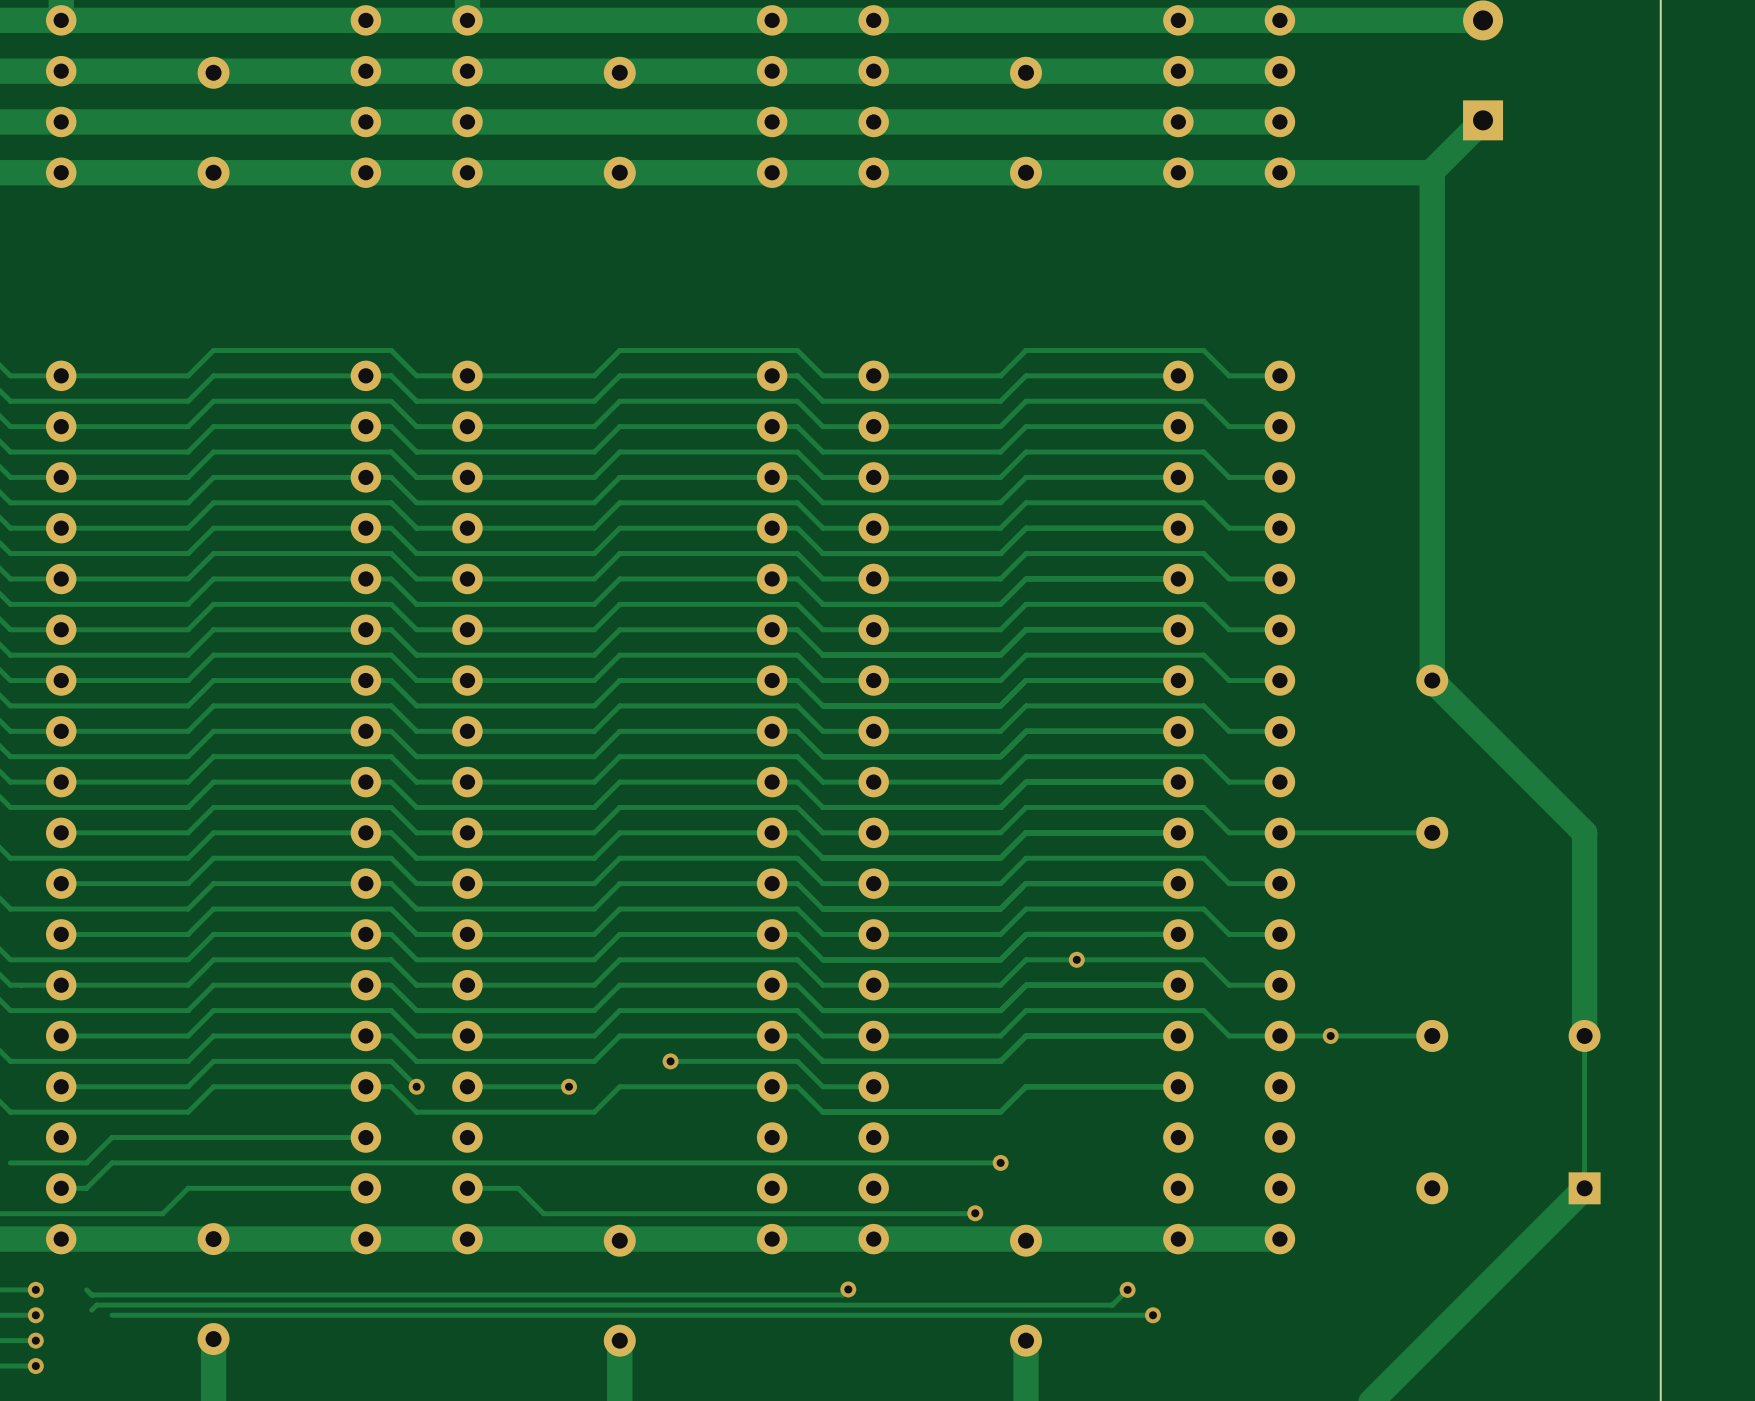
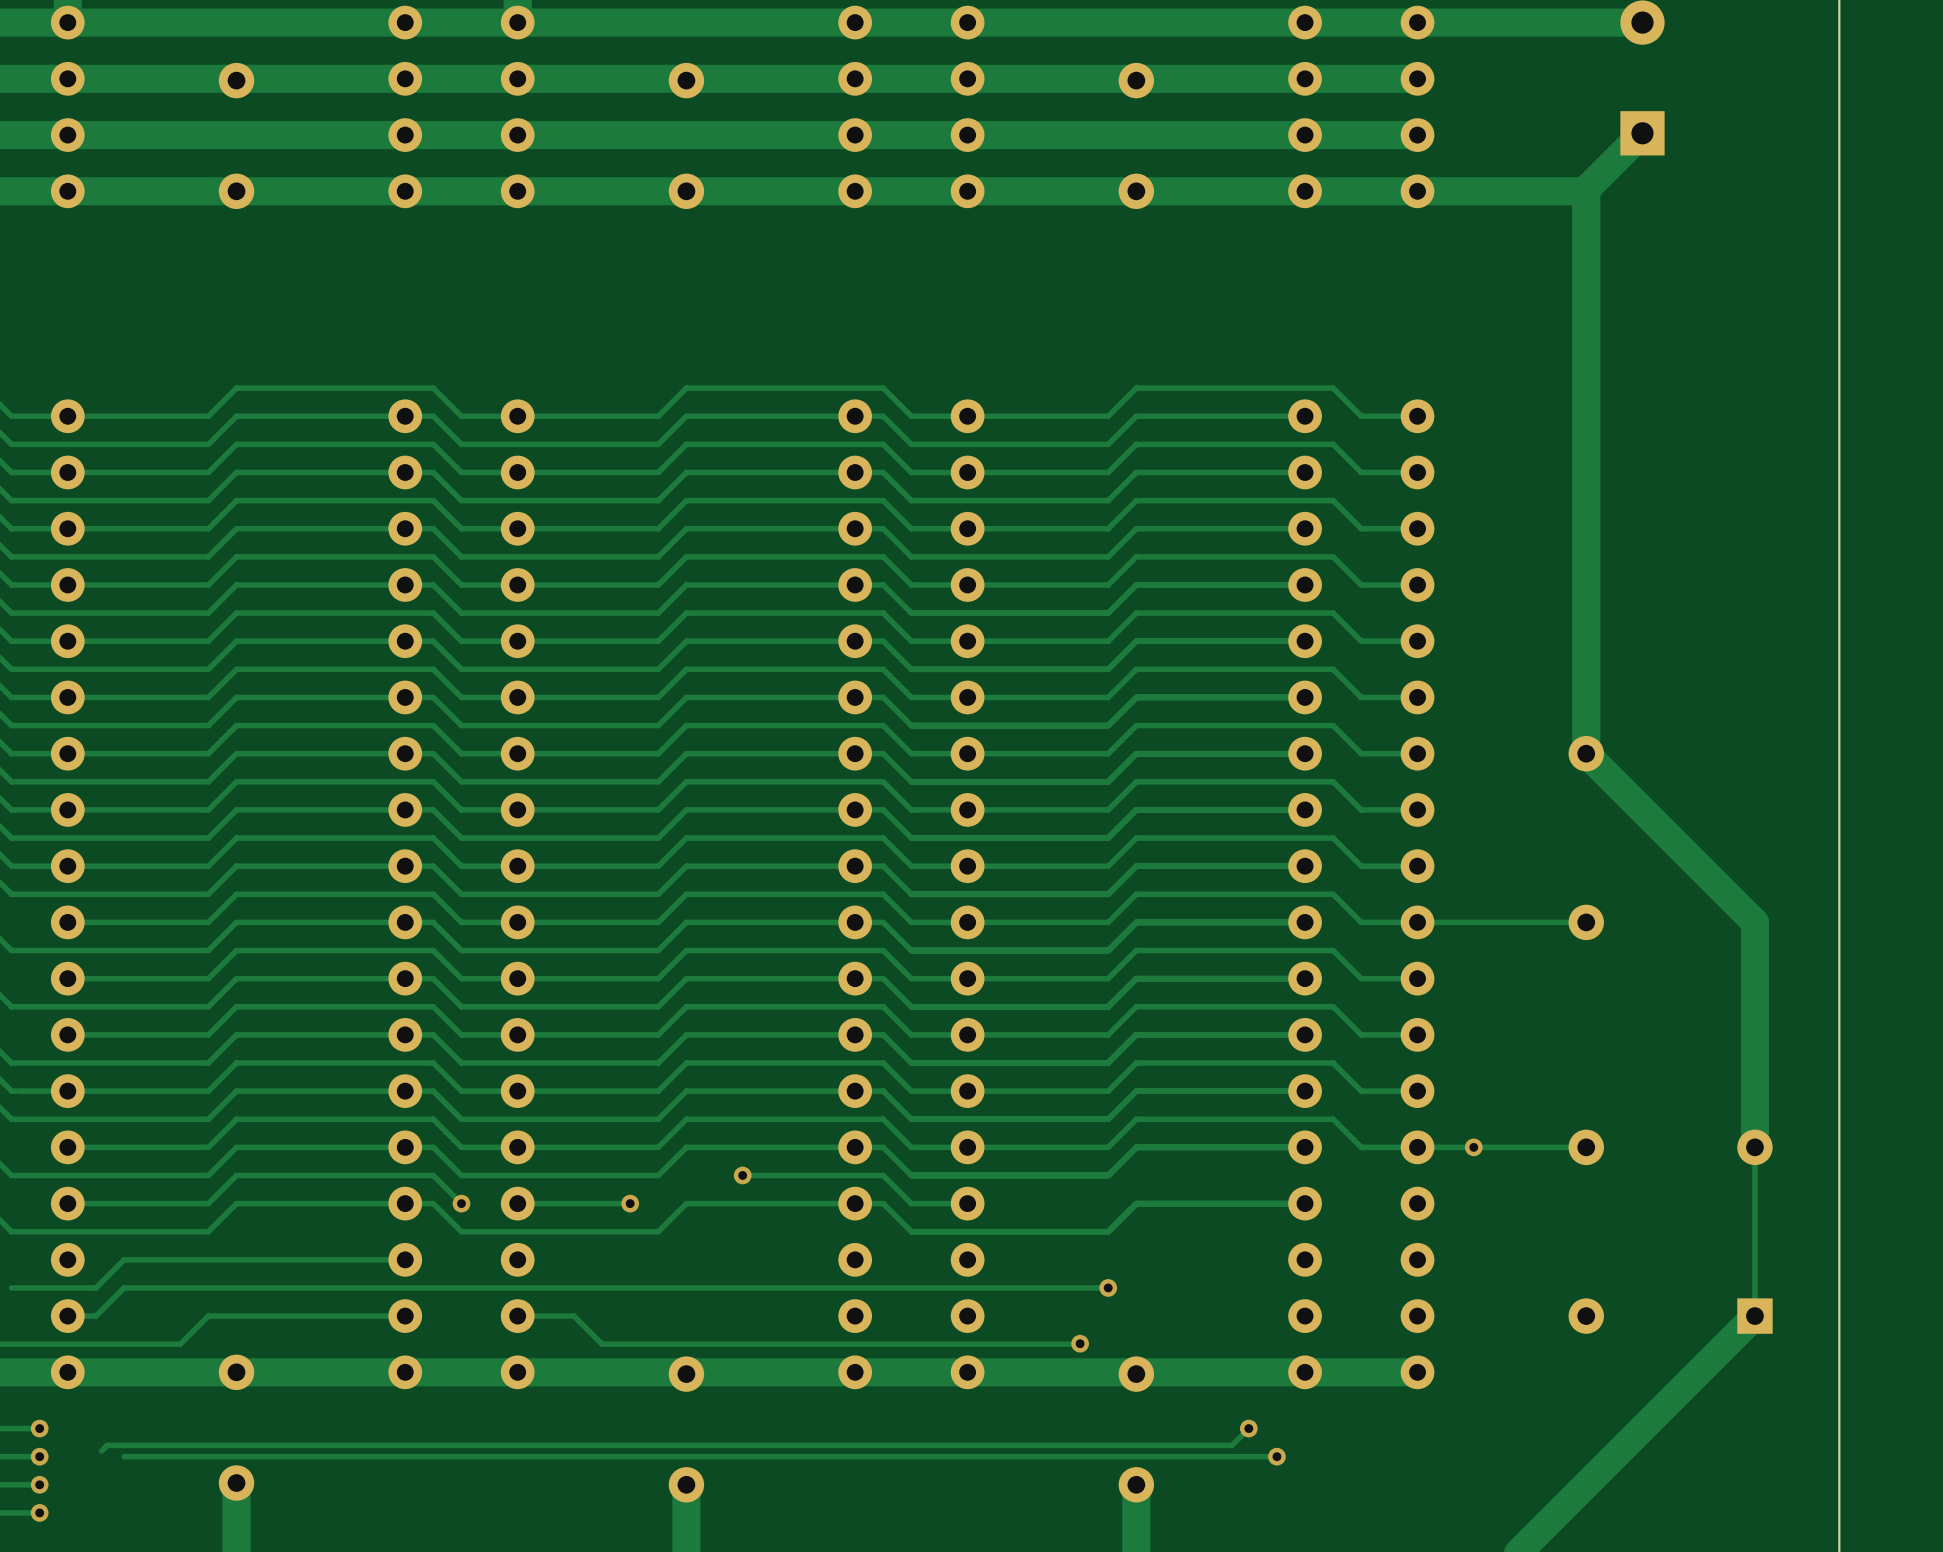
via: (1076, 959) -> none
track: (848, 1289) (842, 1294) (92, 1295) (86, 1289) -> none
via: (848, 1289) -> none

